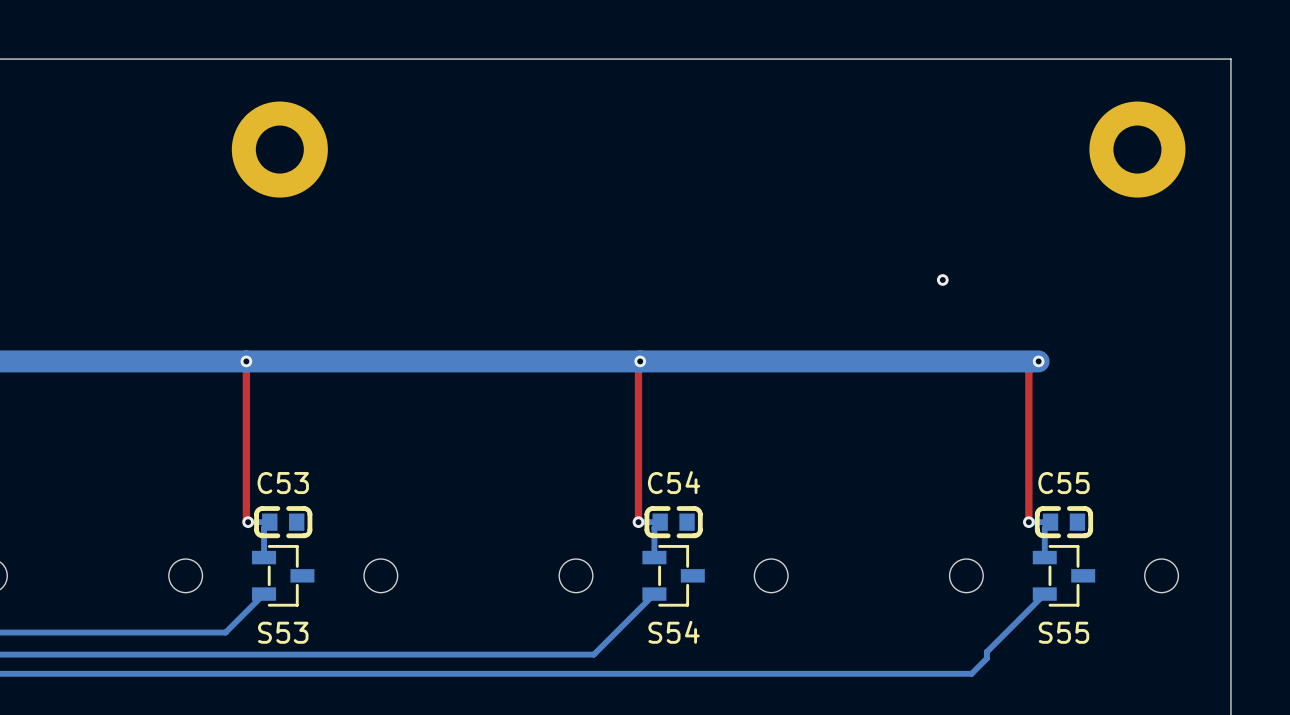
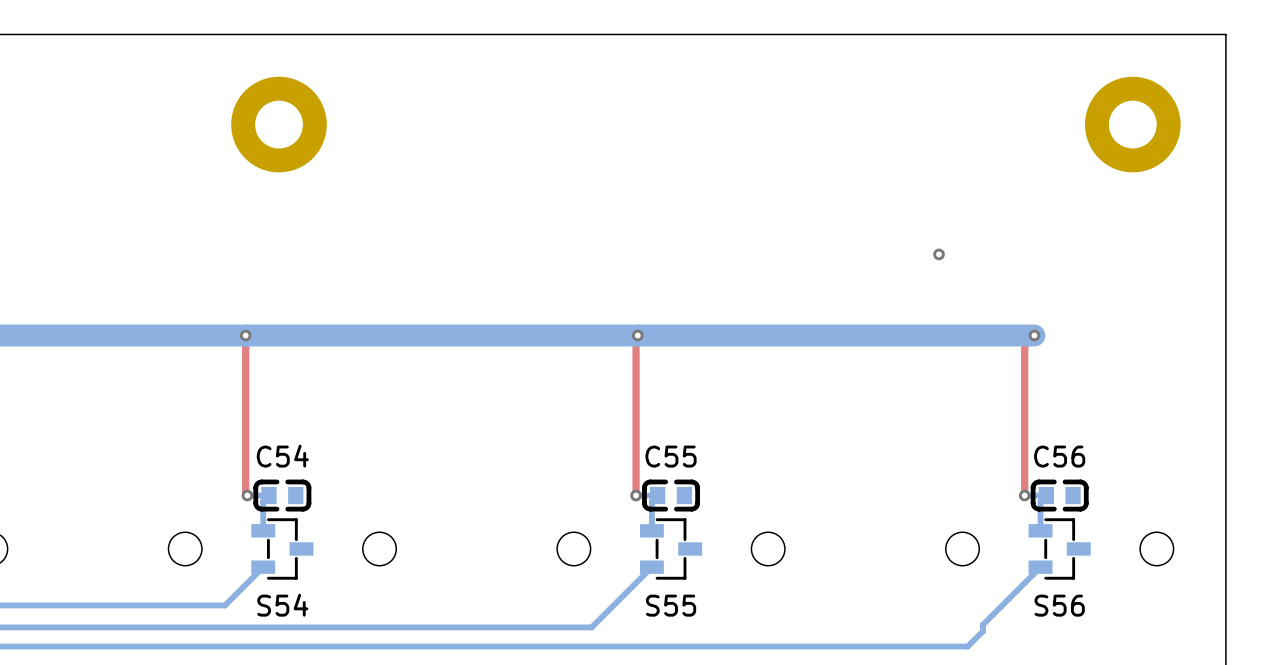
C54 name: C54 (674, 482) -> C55 (671, 456)
C53 name: C53 (283, 483) -> C54 (282, 456)
C55 name: C55 (1063, 483) -> C56 (1059, 456)
S53 name: S53 (283, 632) -> S54 (282, 605)
S54 name: S54 (674, 632) -> S55 (671, 605)
S55 name: S55 (1063, 632) -> S56 (1059, 605)

